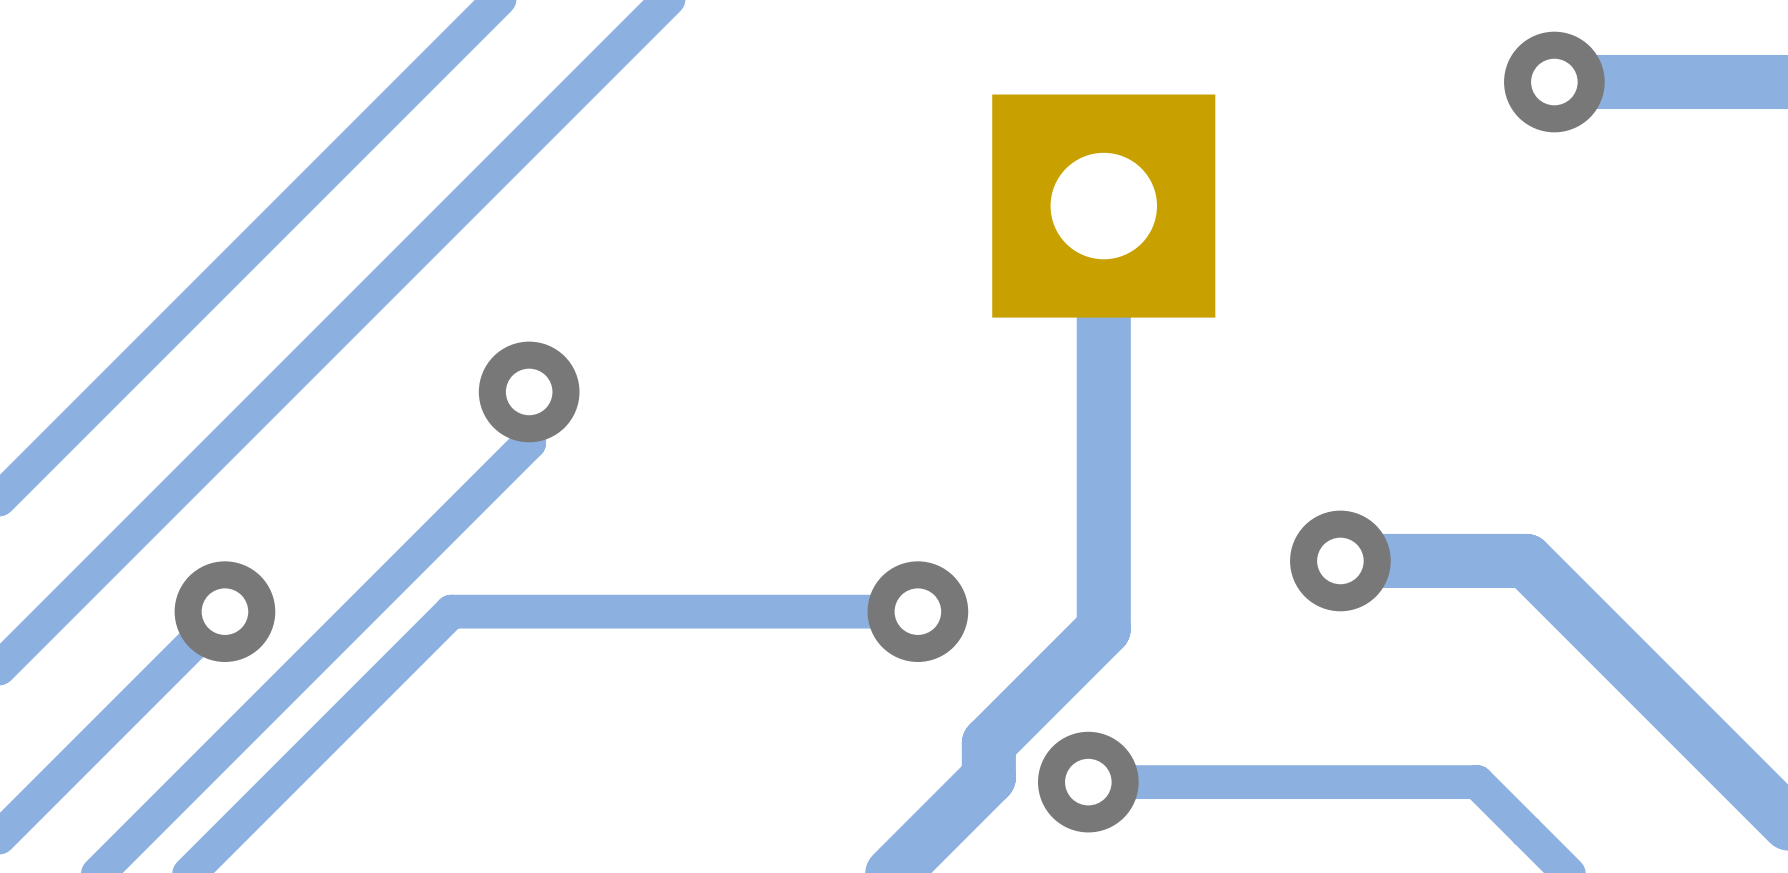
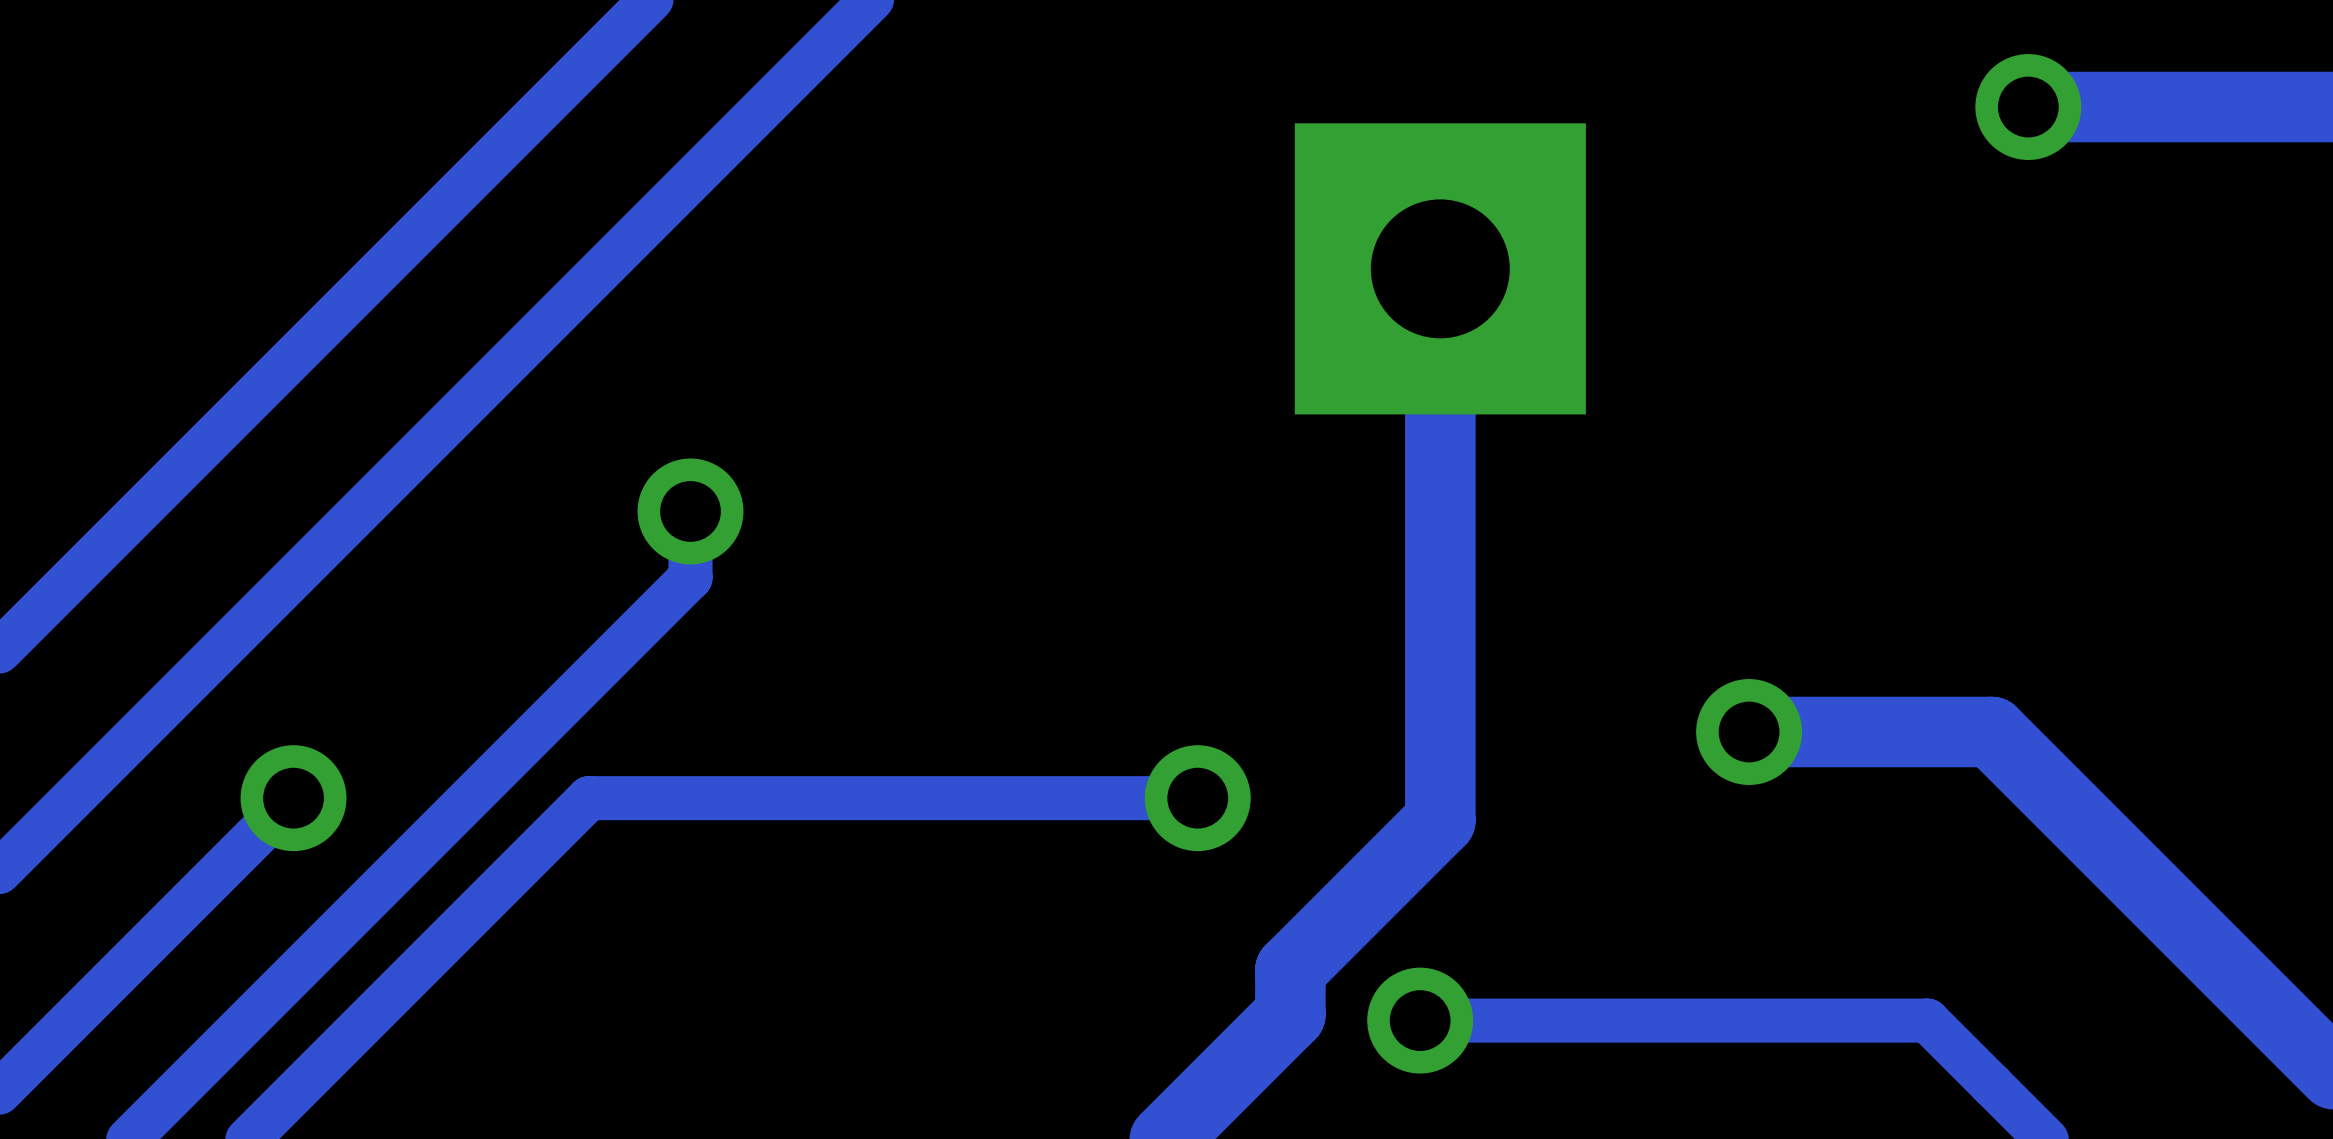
via size: [1504, 31, 1605, 133] -> [1975, 54, 2082, 160]
via size: [478, 341, 580, 443] -> [637, 458, 744, 565]
via size: [1290, 510, 1391, 612] -> [1696, 679, 1803, 785]
via size: [174, 561, 276, 662] -> [240, 745, 347, 852]
via size: [867, 561, 969, 662] -> [1144, 745, 1251, 852]
via size: [1038, 731, 1139, 833] -> [1367, 967, 1474, 1074]

